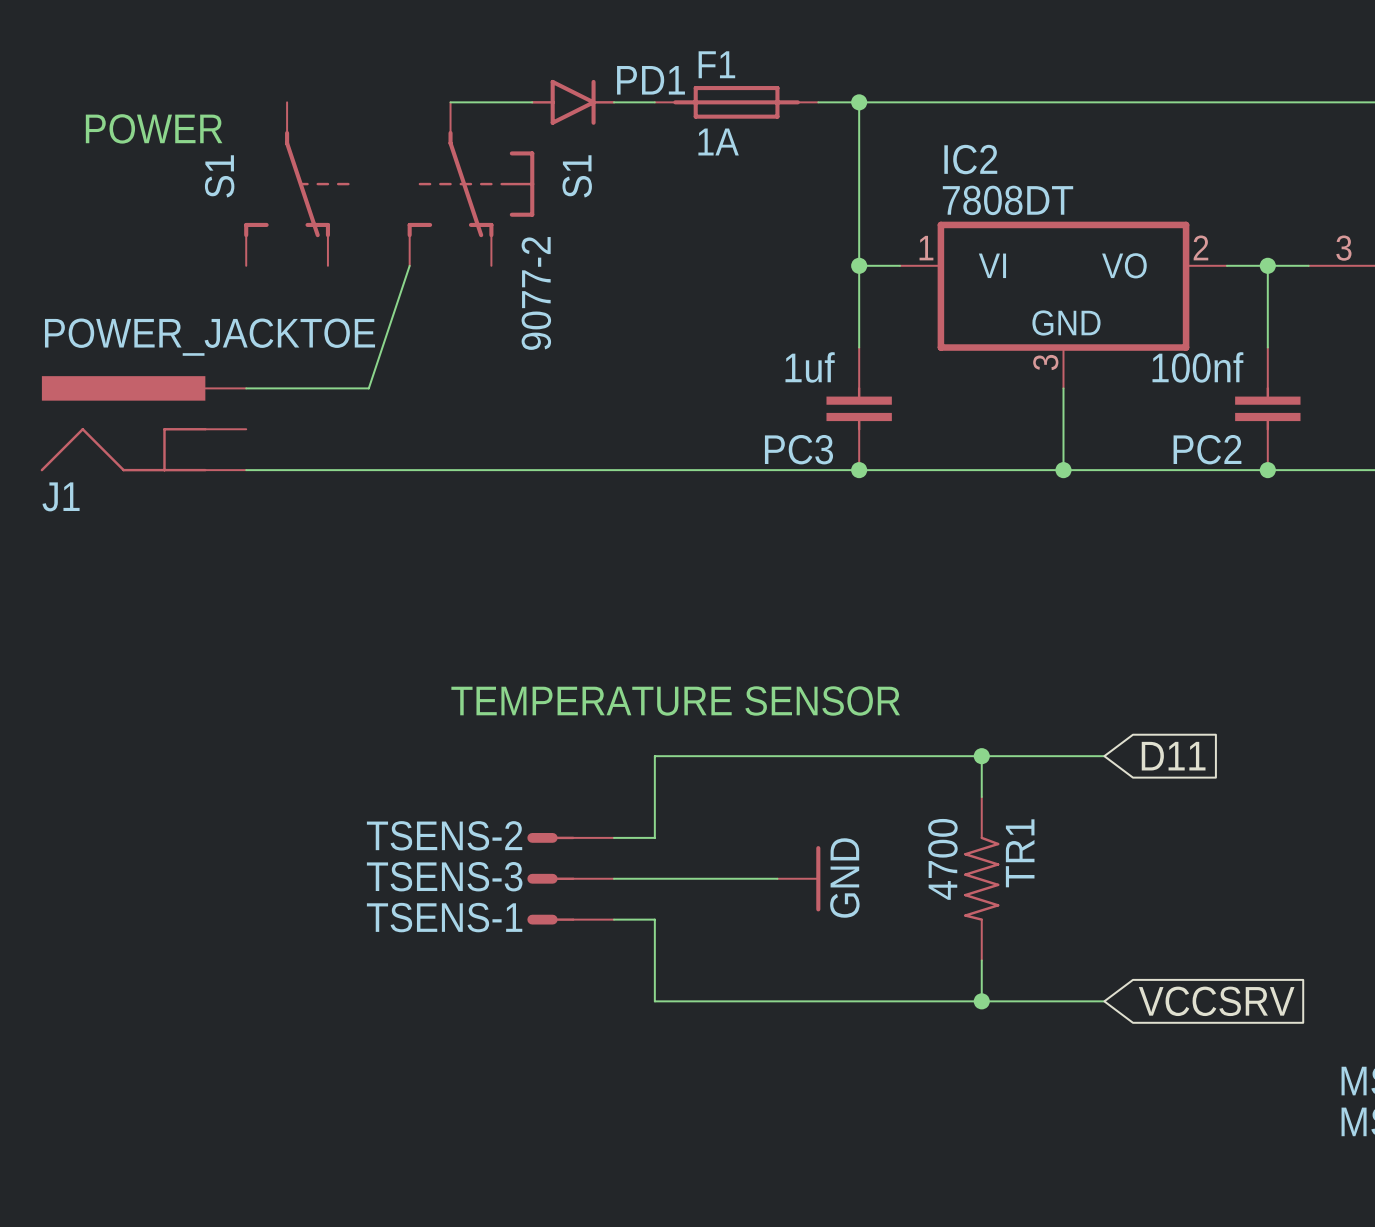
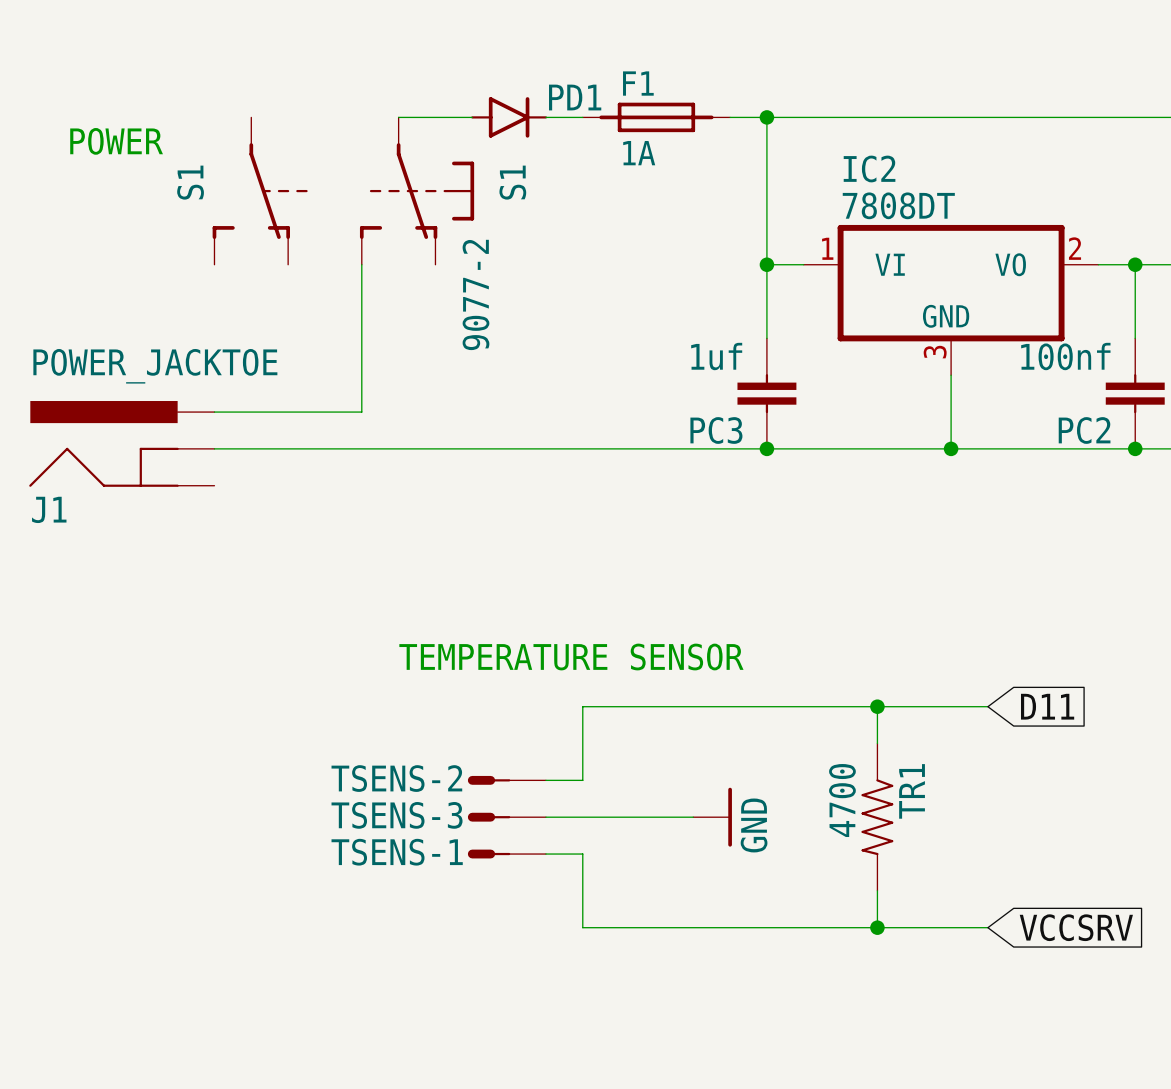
wire: (409, 265) (368, 388) (246, 388) -> (361, 264) (361, 412) (214, 412)
J1 position: (143, 423) -> (121, 443)

